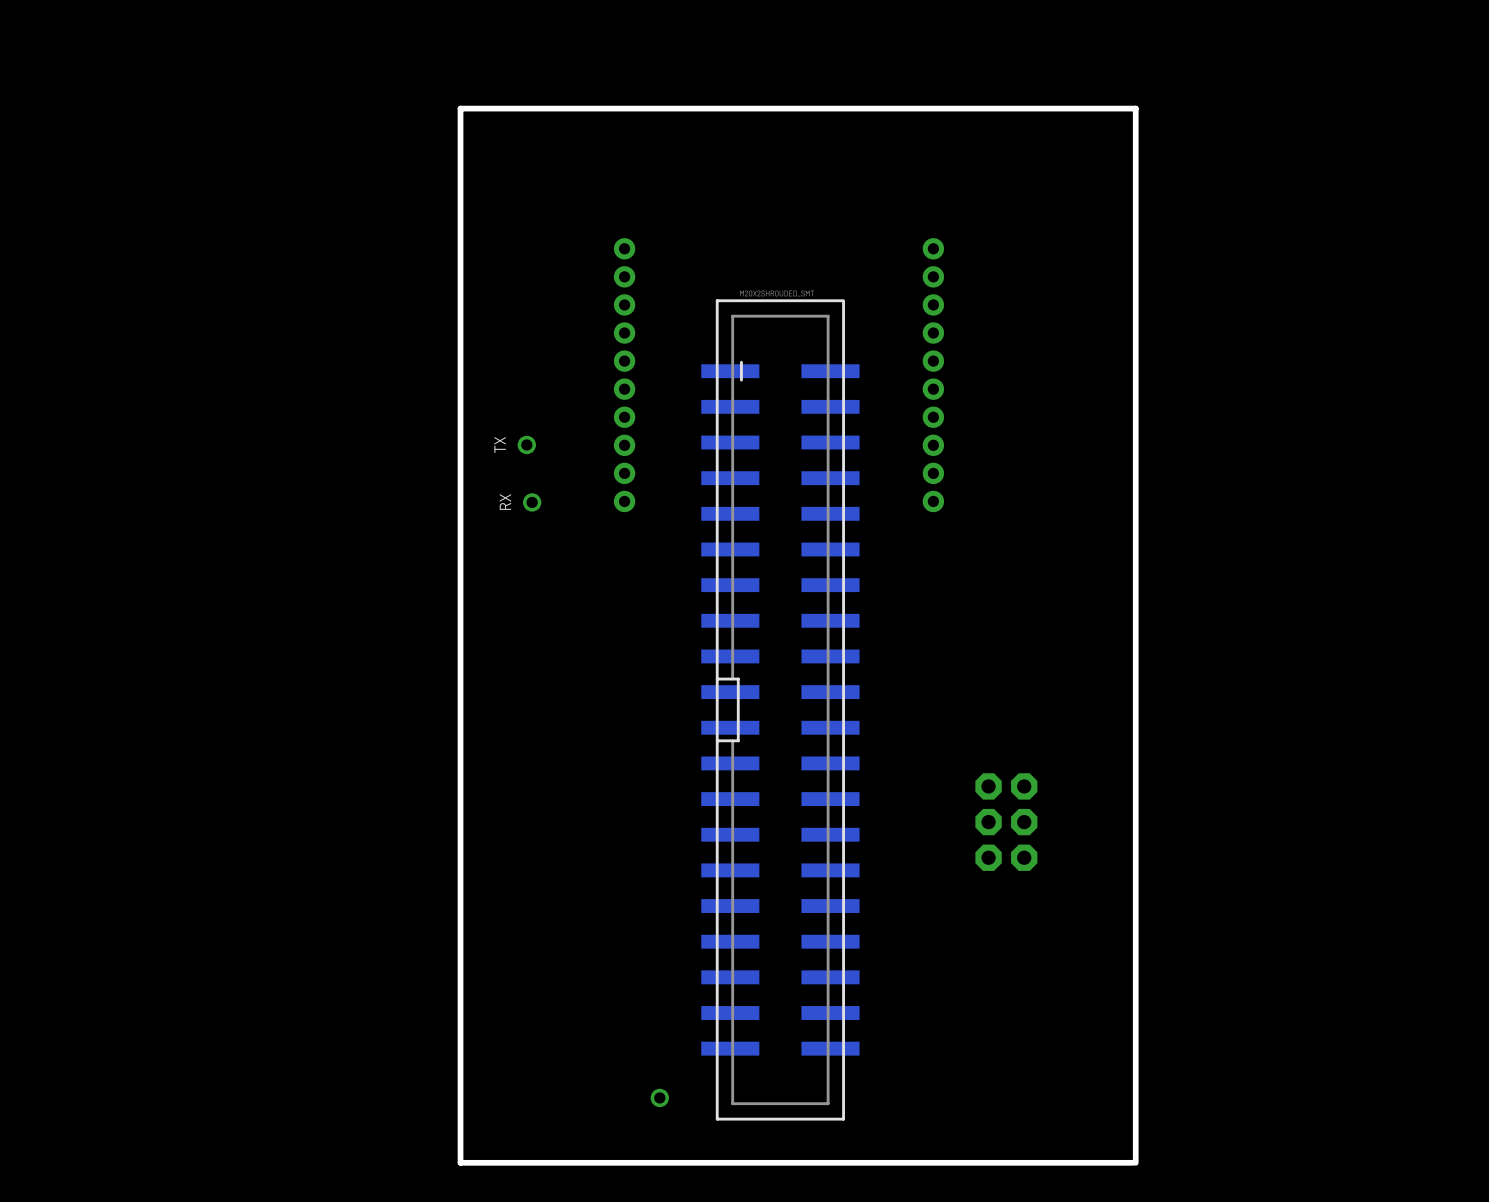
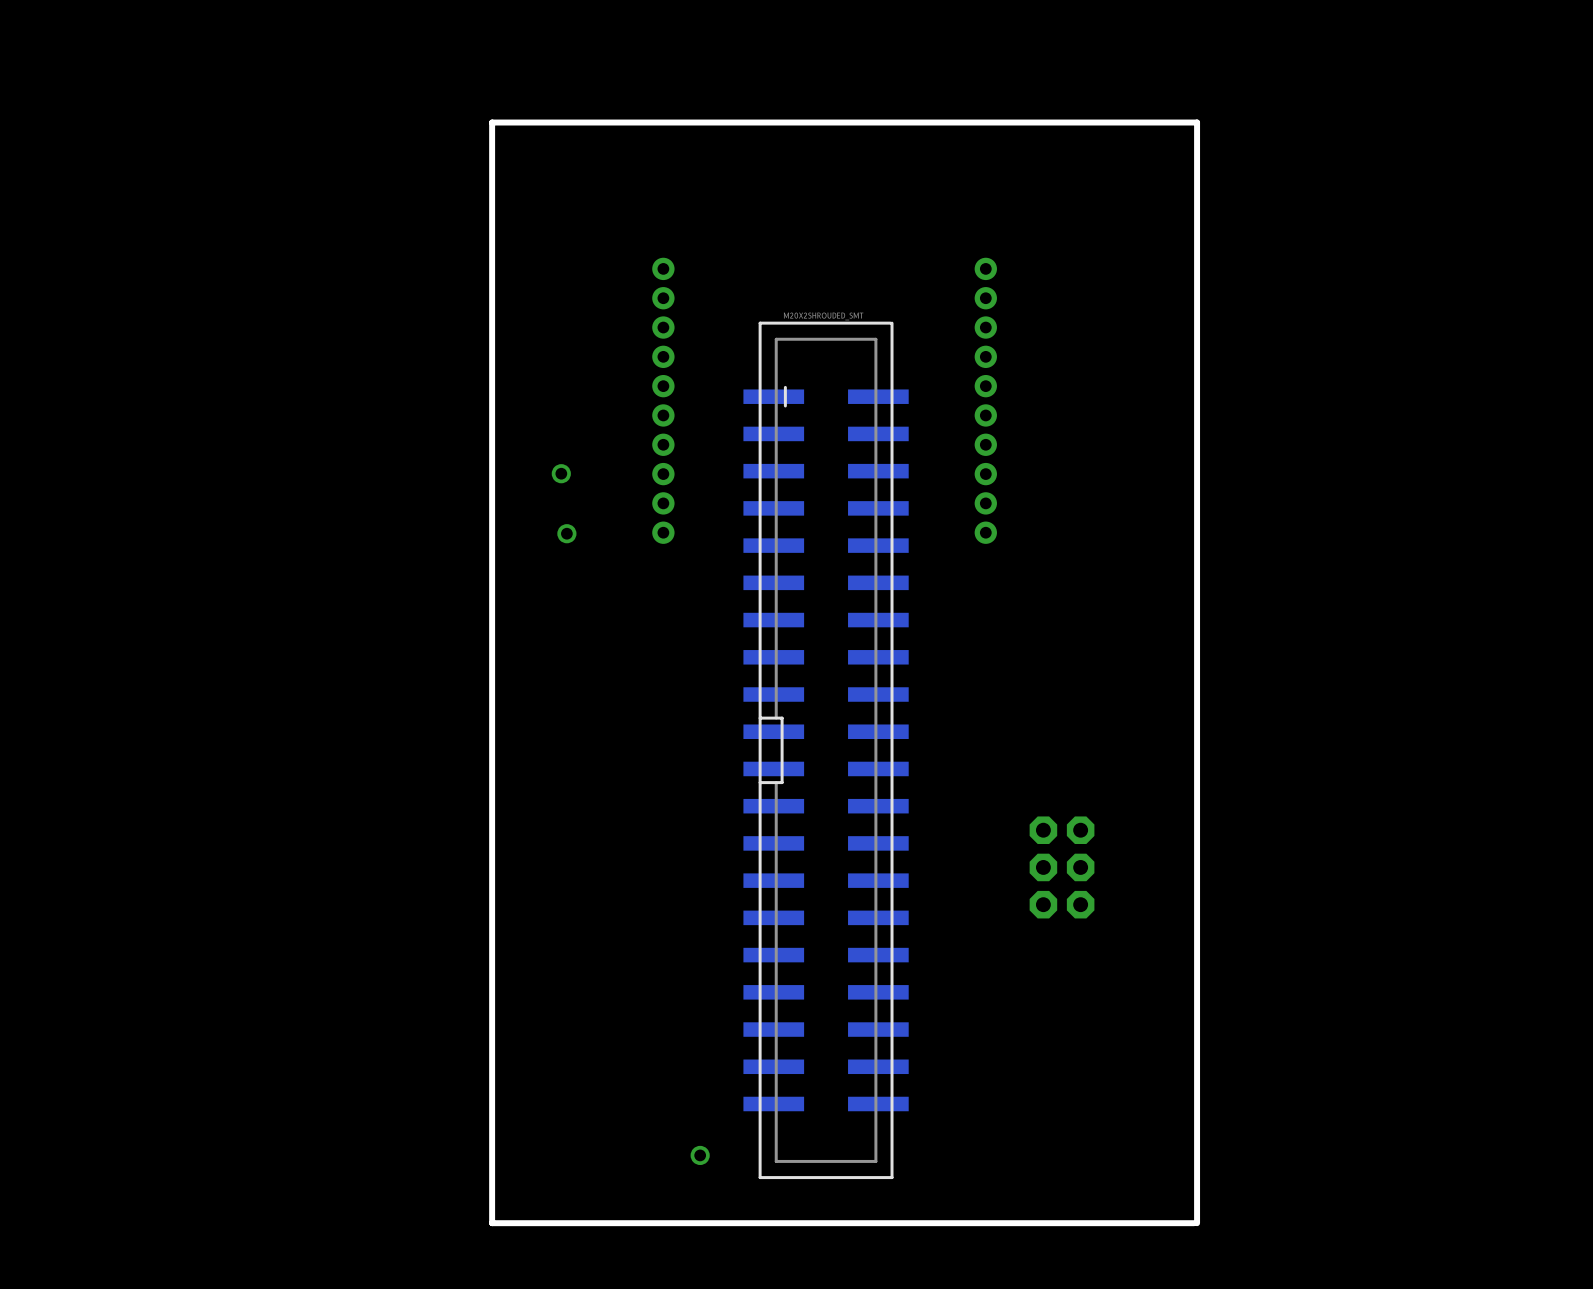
TX name: TX (500, 444) -> none
RX name: RX (505, 502) -> none

